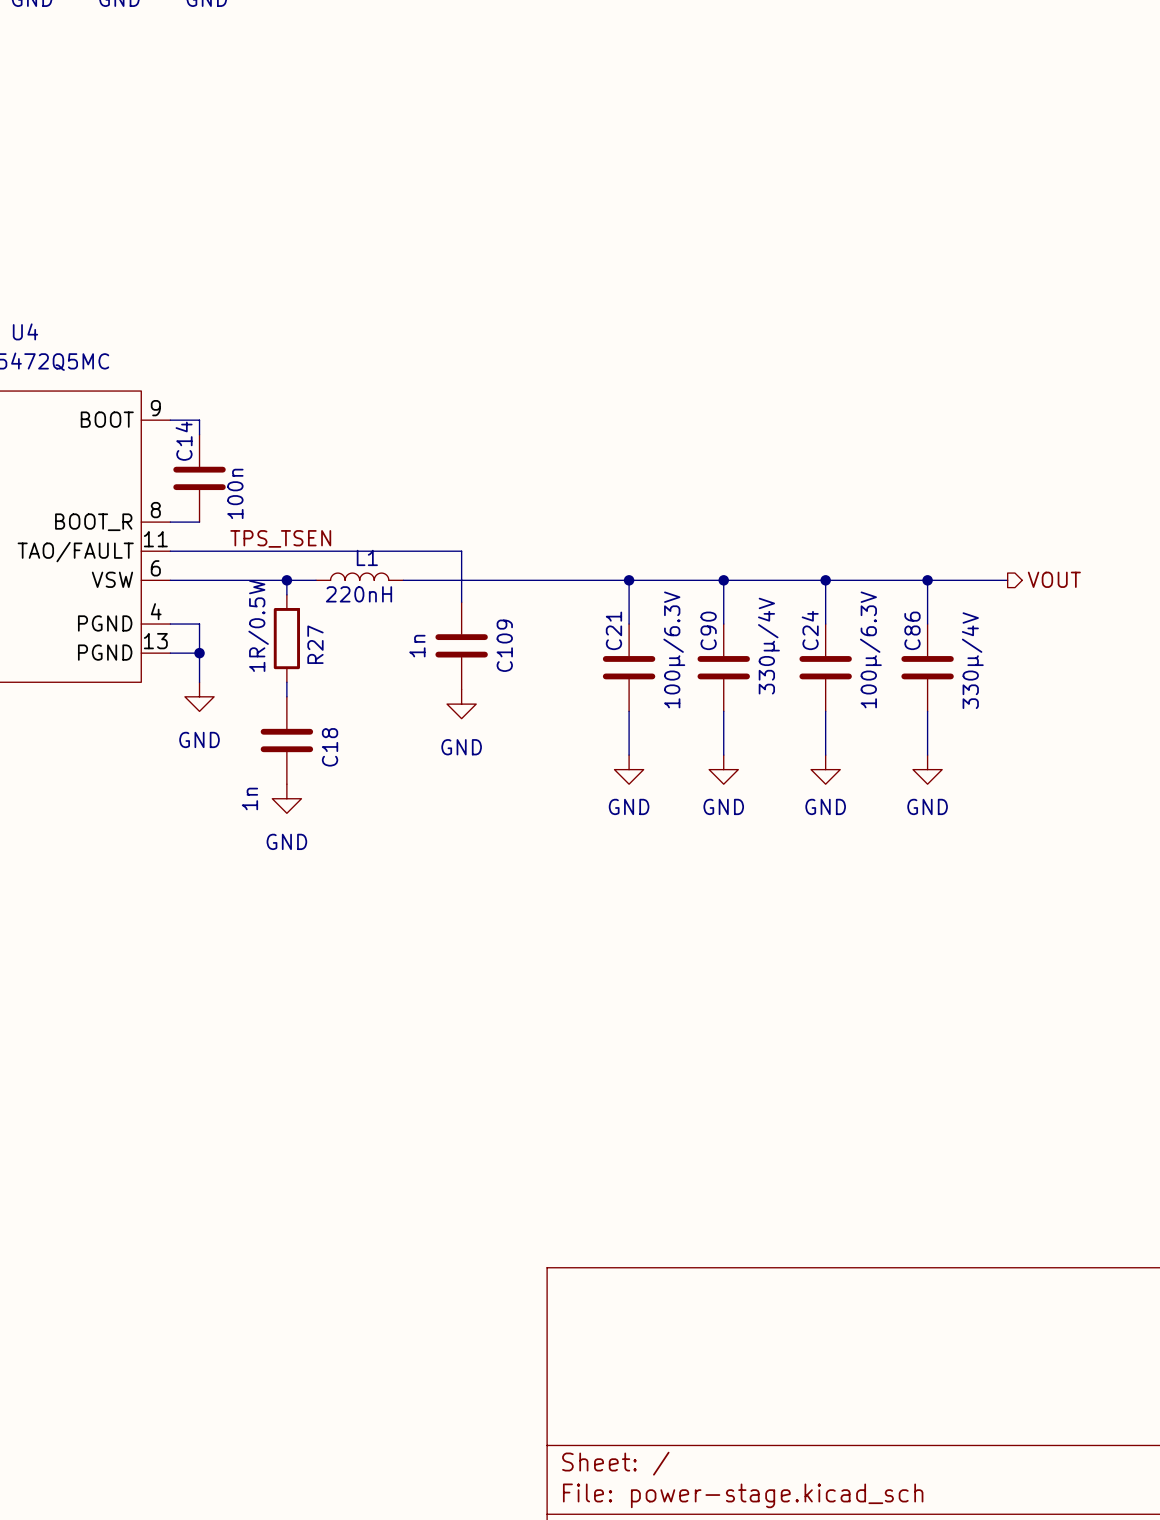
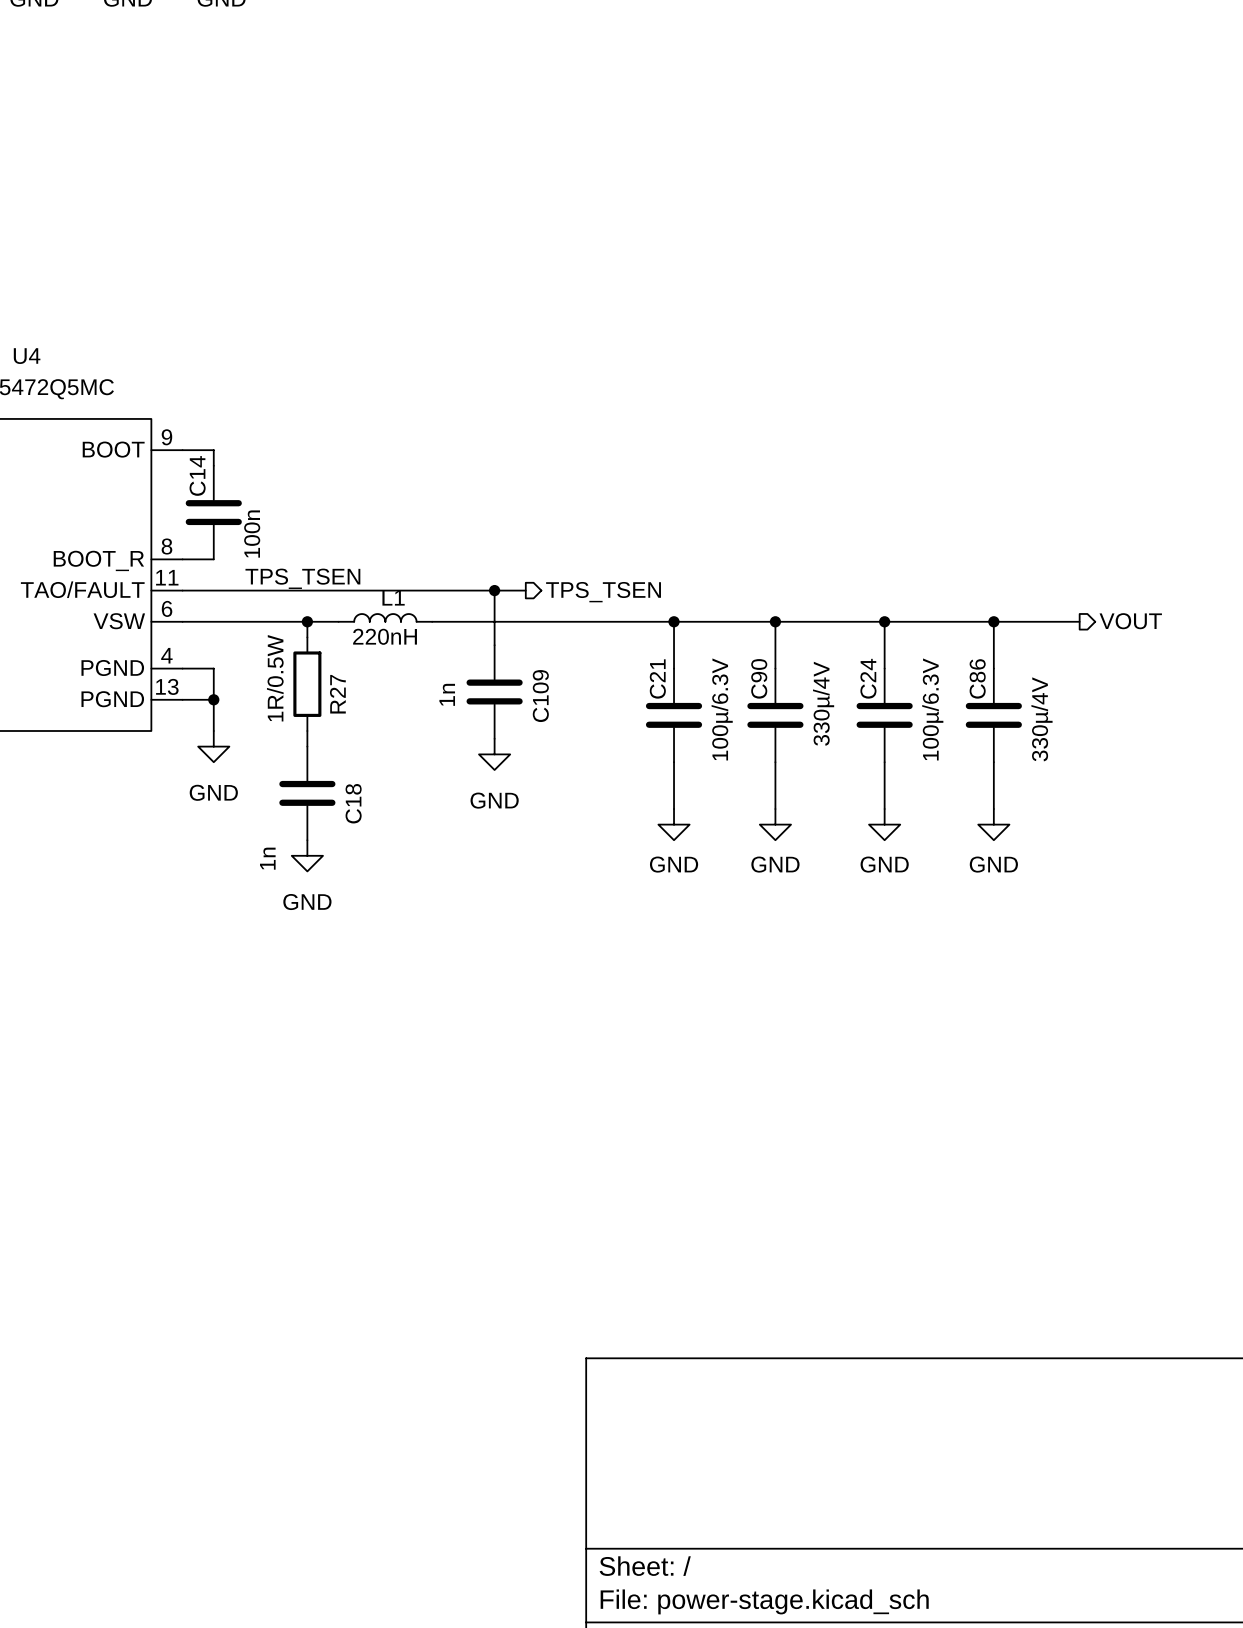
wire: none -> (494, 590) (525, 590)
junction: none -> (494, 590)
hierarchical label: none -> TPS_TSEN (603, 592)

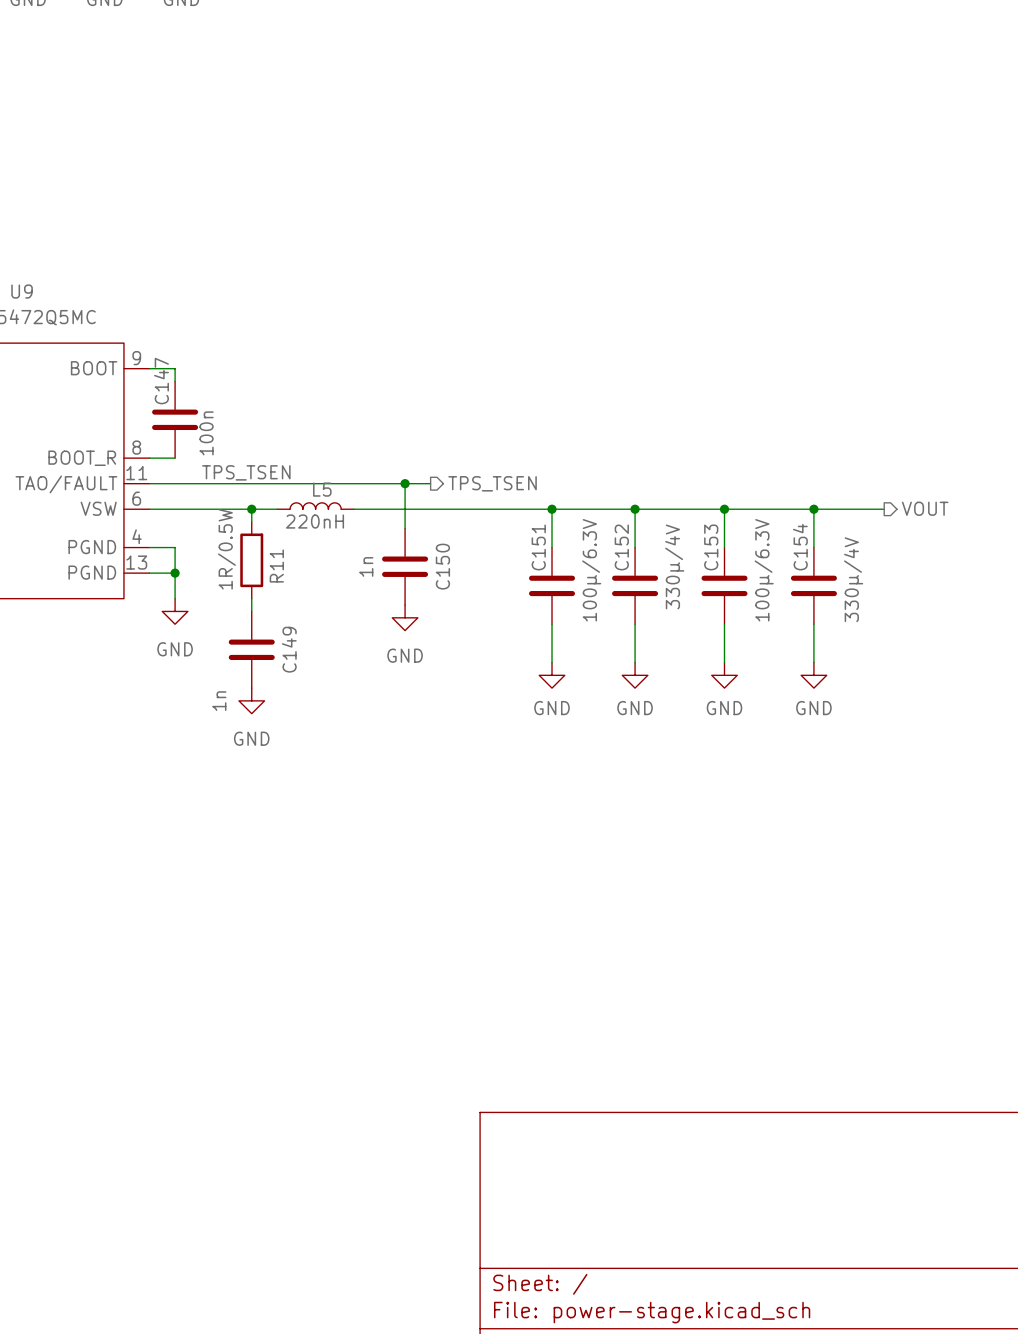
U4 name: U4 (27, 356) -> U9 (22, 291)
C14 name: C14 (197, 475) -> C147 (161, 381)
L1 name: L1 (393, 597) -> L5 (322, 489)
C21 name: C21 (657, 678) -> C151 (538, 547)
C90 name: C90 (759, 678) -> C152 (621, 547)
C24 name: C24 (868, 678) -> C153 (711, 547)
C86 name: C86 (977, 678) -> C154 (800, 547)
R27 name: R27 (337, 694) -> R11 (276, 566)
C109 name: C109 (540, 696) -> C150 (442, 566)
C18 name: C18 (353, 803) -> C149 (289, 649)

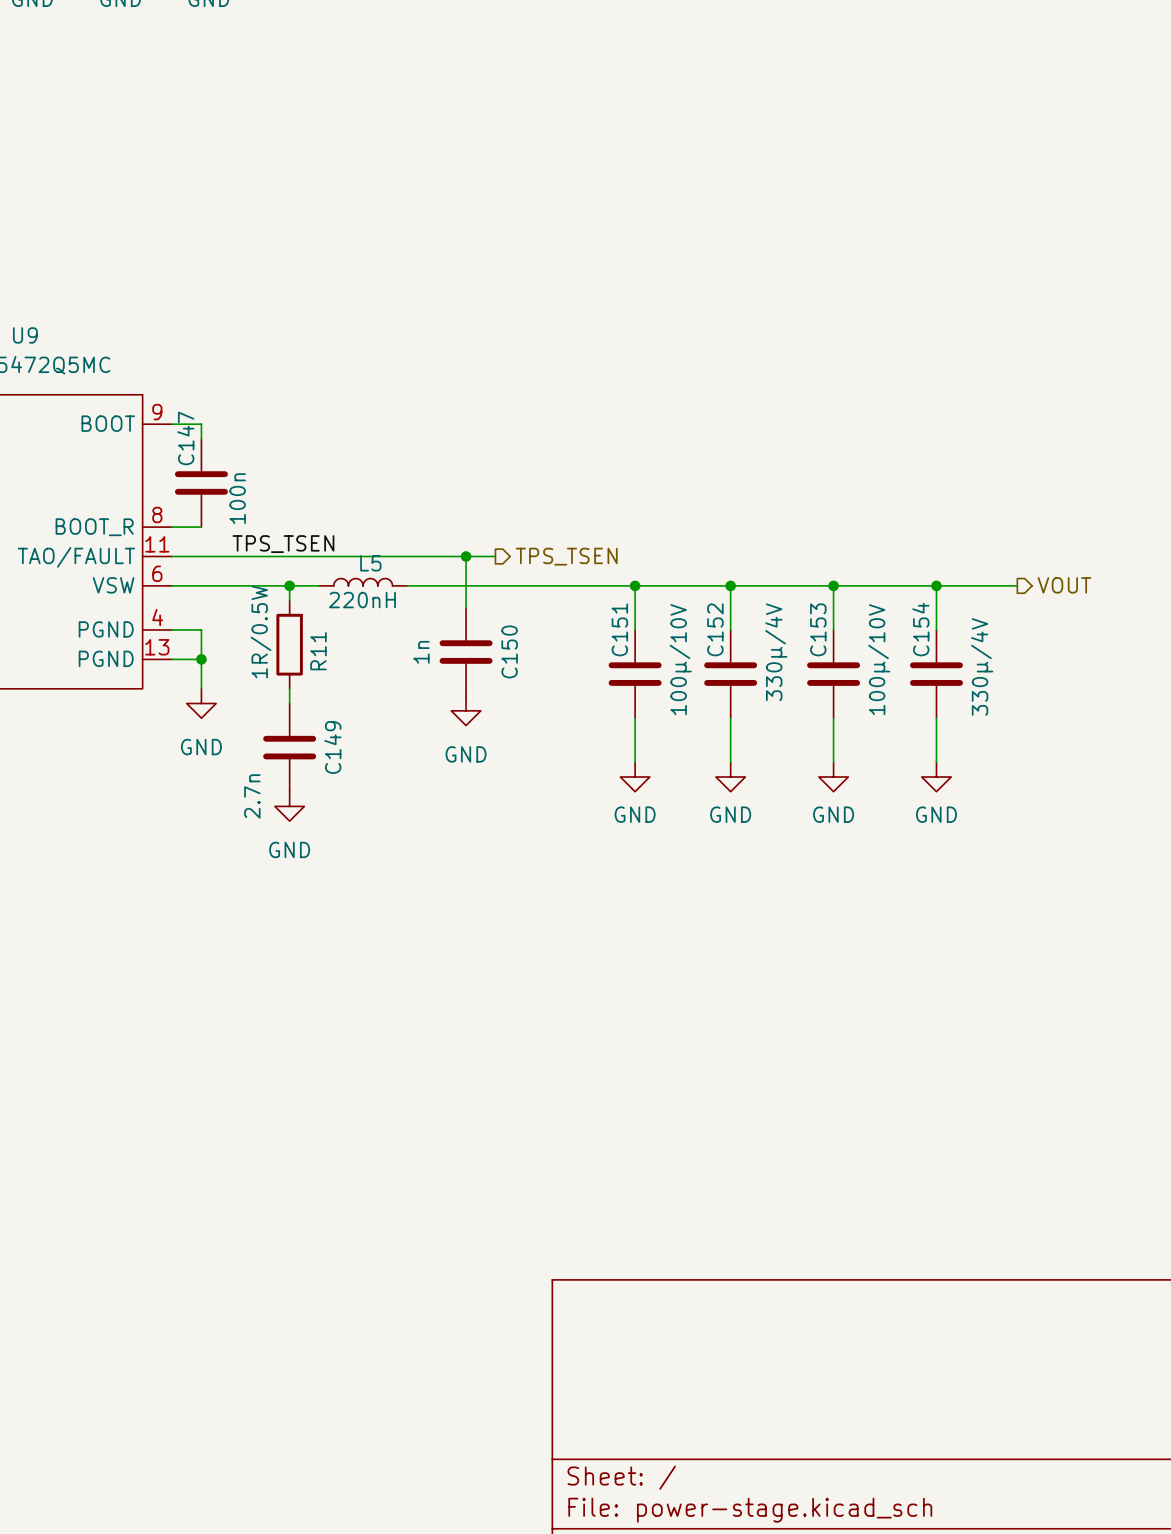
C151 value: 100µ/6.3V (591, 570) -> 100µ/10V (680, 659)
C153 value: 100µ/6.3V (764, 570) -> 100µ/10V (879, 659)
C149 value: 1n (219, 701) -> 2.7n (252, 796)

